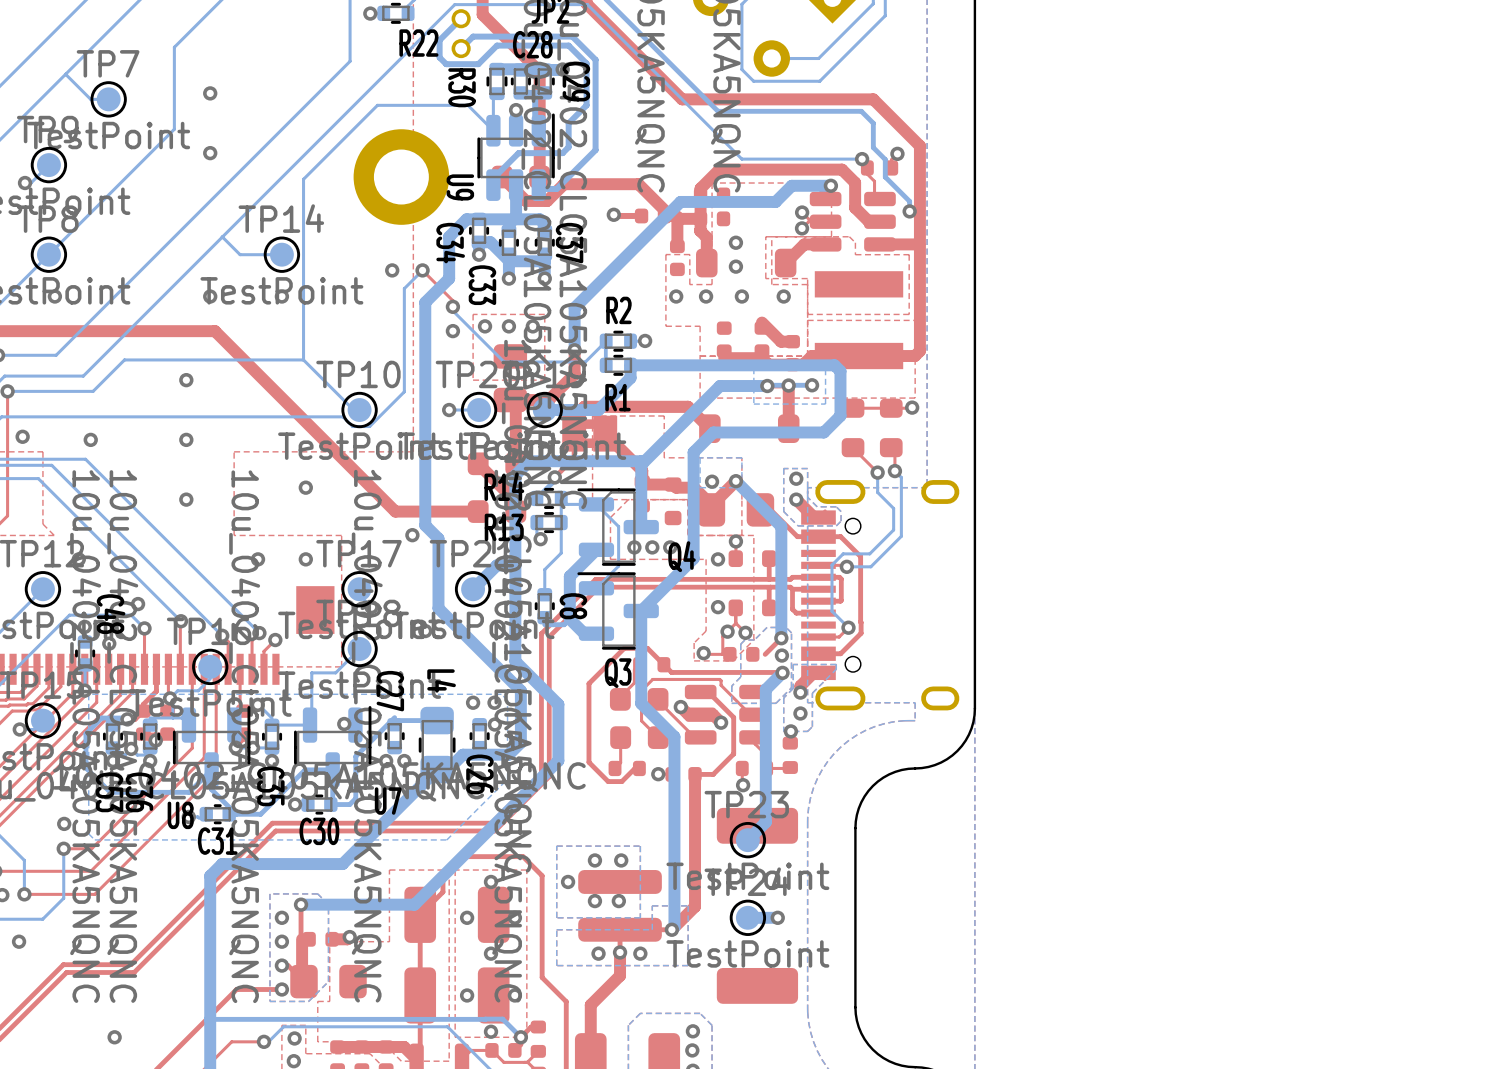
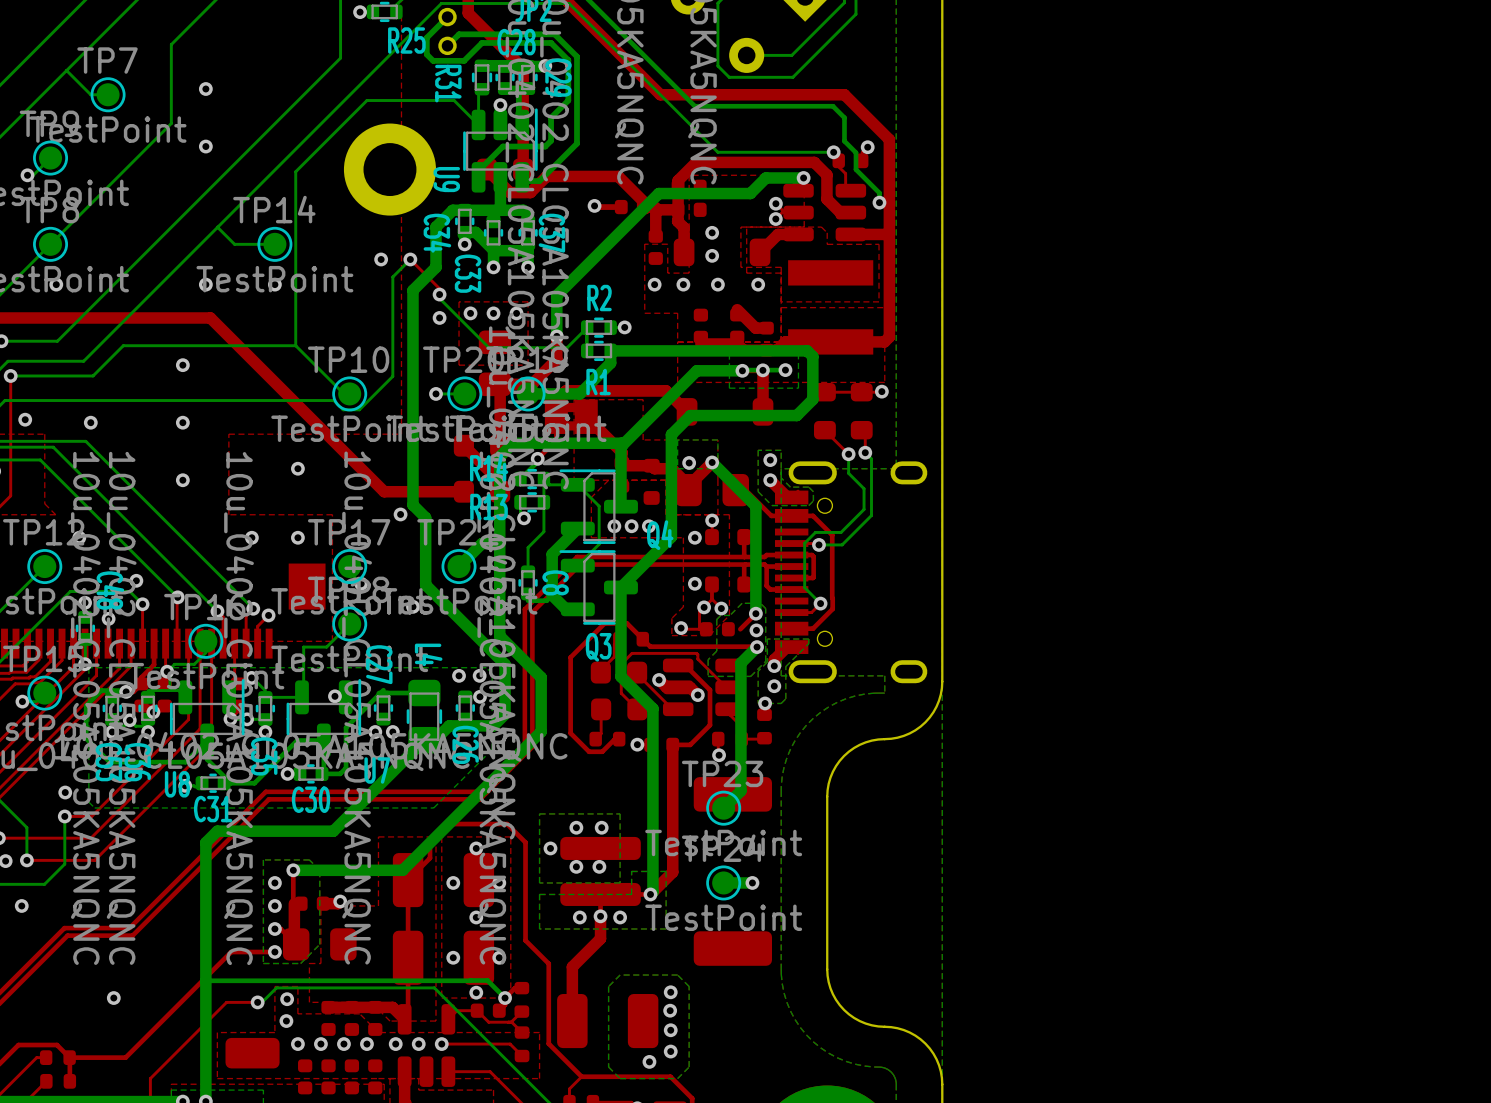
R22 name: R22 (418, 43) -> R25 (406, 40)
R30 name: R30 (462, 87) -> R31 (448, 83)

